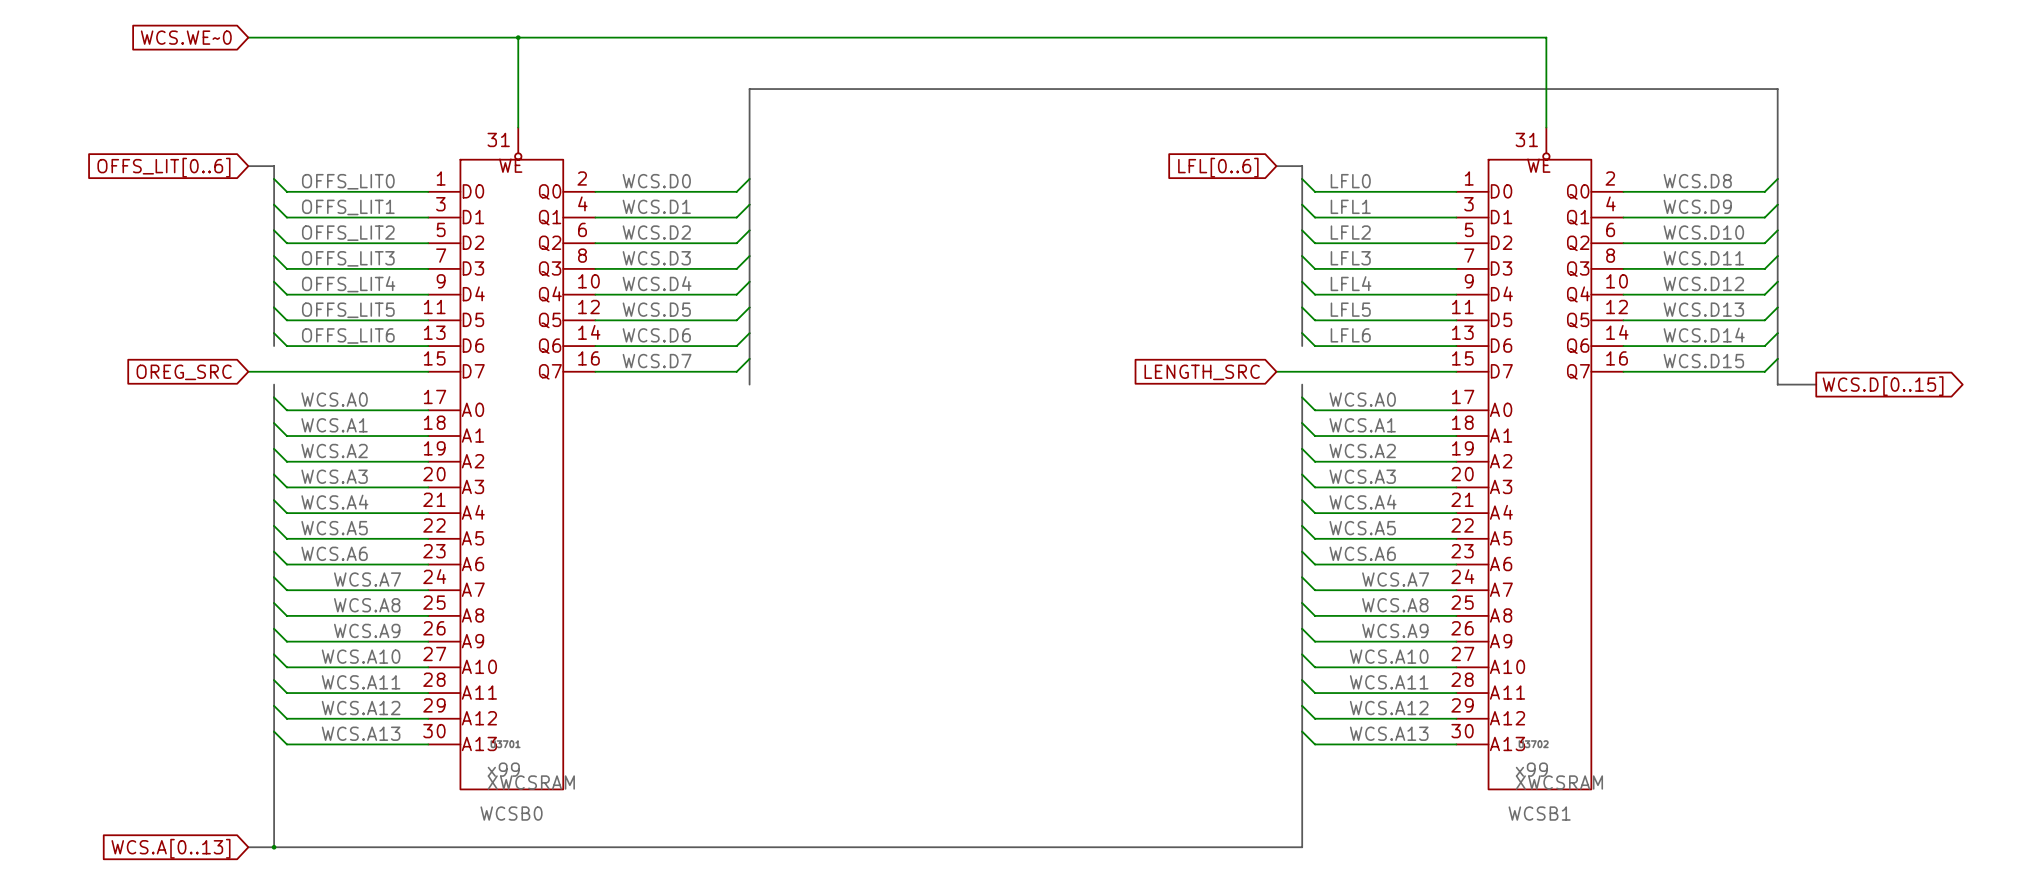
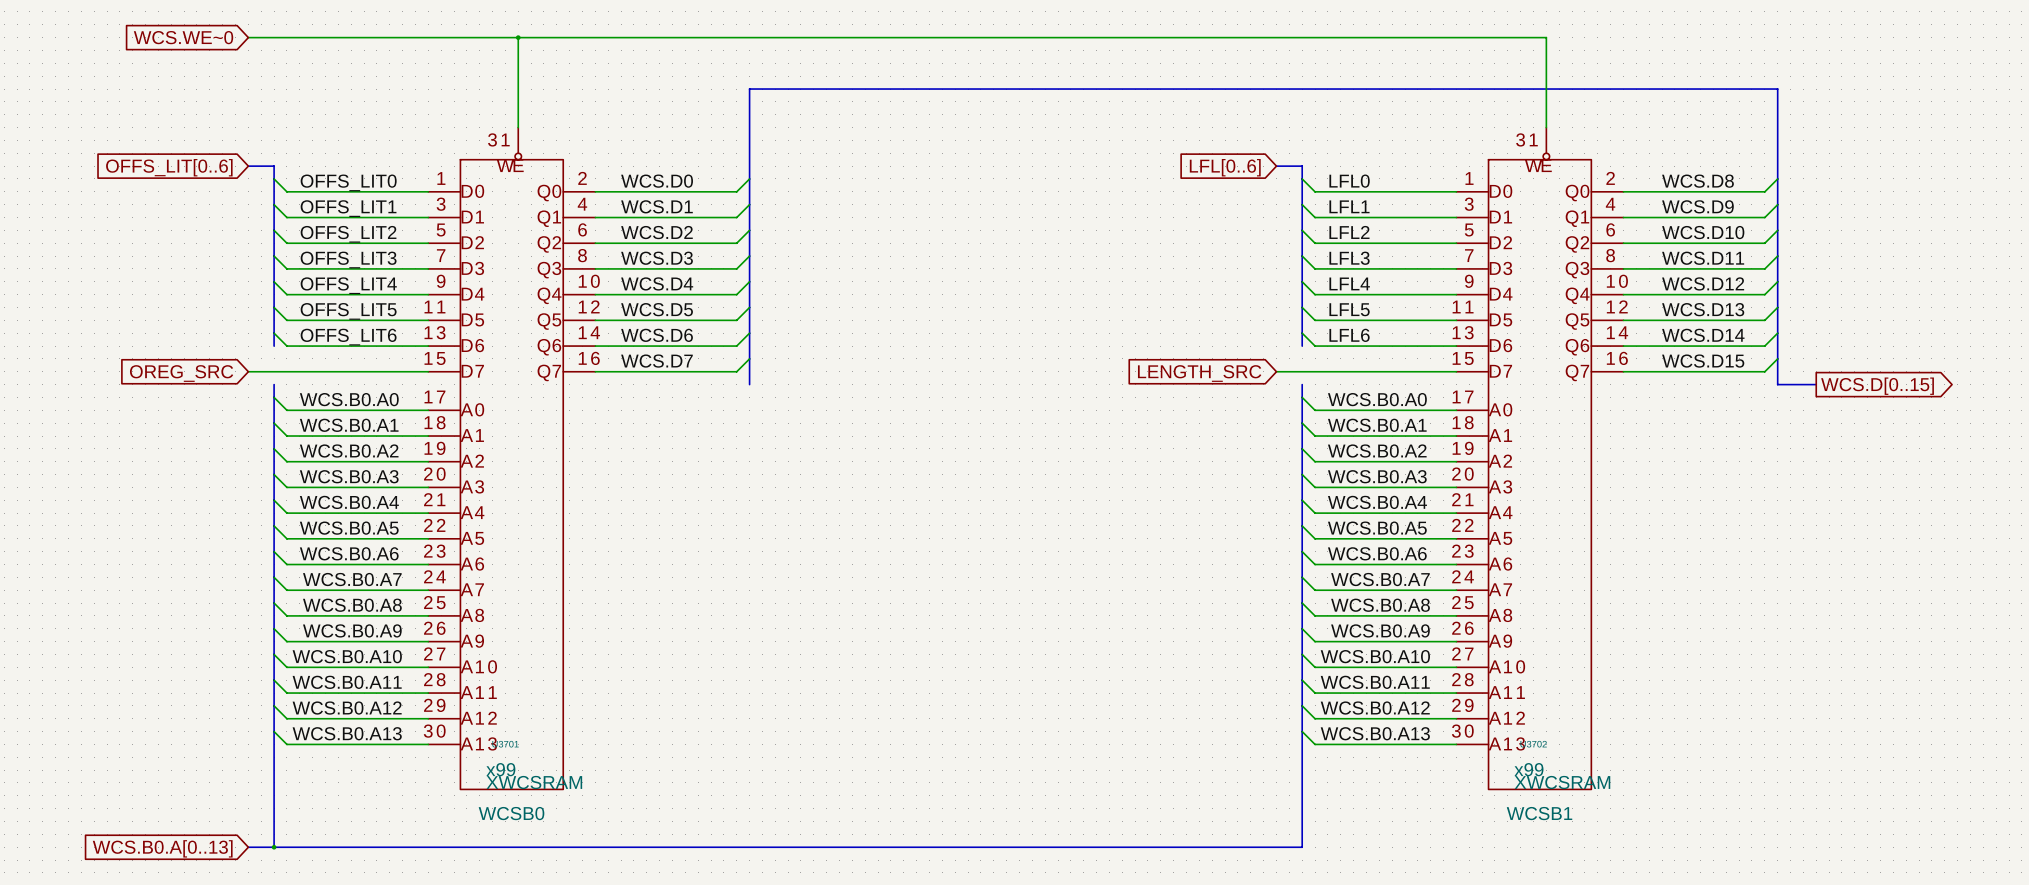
label: WCS.A0 (334, 399) -> WCS.B0.A0 (349, 399)
label: WCS.A0 (1362, 399) -> WCS.B0.A0 (1377, 399)
label: WCS.A1 (334, 425) -> WCS.B0.A1 (349, 425)
label: WCS.A1 (1362, 425) -> WCS.B0.A1 (1377, 425)
label: WCS.A2 (334, 451) -> WCS.B0.A2 (349, 451)
label: WCS.A2 (1362, 451) -> WCS.B0.A2 (1377, 451)
label: WCS.A3 (334, 476) -> WCS.B0.A3 (349, 476)
label: WCS.A3 (1362, 476) -> WCS.B0.A3 (1377, 476)
label: WCS.A4 (334, 502) -> WCS.B0.A4 (349, 502)
label: WCS.A4 (1362, 502) -> WCS.B0.A4 (1377, 502)
label: WCS.A5 (334, 528) -> WCS.B0.A5 (349, 528)
label: WCS.A5 (1362, 528) -> WCS.B0.A5 (1377, 528)
label: WCS.A6 (334, 553) -> WCS.B0.A6 (349, 553)
label: WCS.A6 (1362, 553) -> WCS.B0.A6 (1377, 553)
label: WCS.A7 (367, 579) -> WCS.B0.A7 (352, 579)
label: WCS.A7 (1395, 579) -> WCS.B0.A7 (1380, 579)
label: WCS.A8 (367, 605) -> WCS.B0.A8 (352, 605)
label: WCS.A8 (1395, 605) -> WCS.B0.A8 (1380, 605)
label: WCS.A9 (367, 630) -> WCS.B0.A9 (352, 630)
label: WCS.A9 (1395, 630) -> WCS.B0.A9 (1380, 630)
label: WCS.A10 (361, 656) -> WCS.B0.A10 (347, 656)
label: WCS.A10 (1389, 656) -> WCS.B0.A10 (1375, 656)
label: WCS.A11 (361, 682) -> WCS.B0.A11 (347, 682)
label: WCS.A11 (1389, 682) -> WCS.B0.A11 (1375, 682)
label: WCS.A12 (361, 708) -> WCS.B0.A12 (347, 708)
label: WCS.A12 (1389, 708) -> WCS.B0.A12 (1375, 708)
label: WCS.A13 (361, 733) -> WCS.B0.A13 (347, 733)
label: WCS.A13 (1389, 733) -> WCS.B0.A13 (1375, 733)
global label: WCS.A[0..13] (170, 848) -> WCS.B0.A[0..13] (162, 848)

